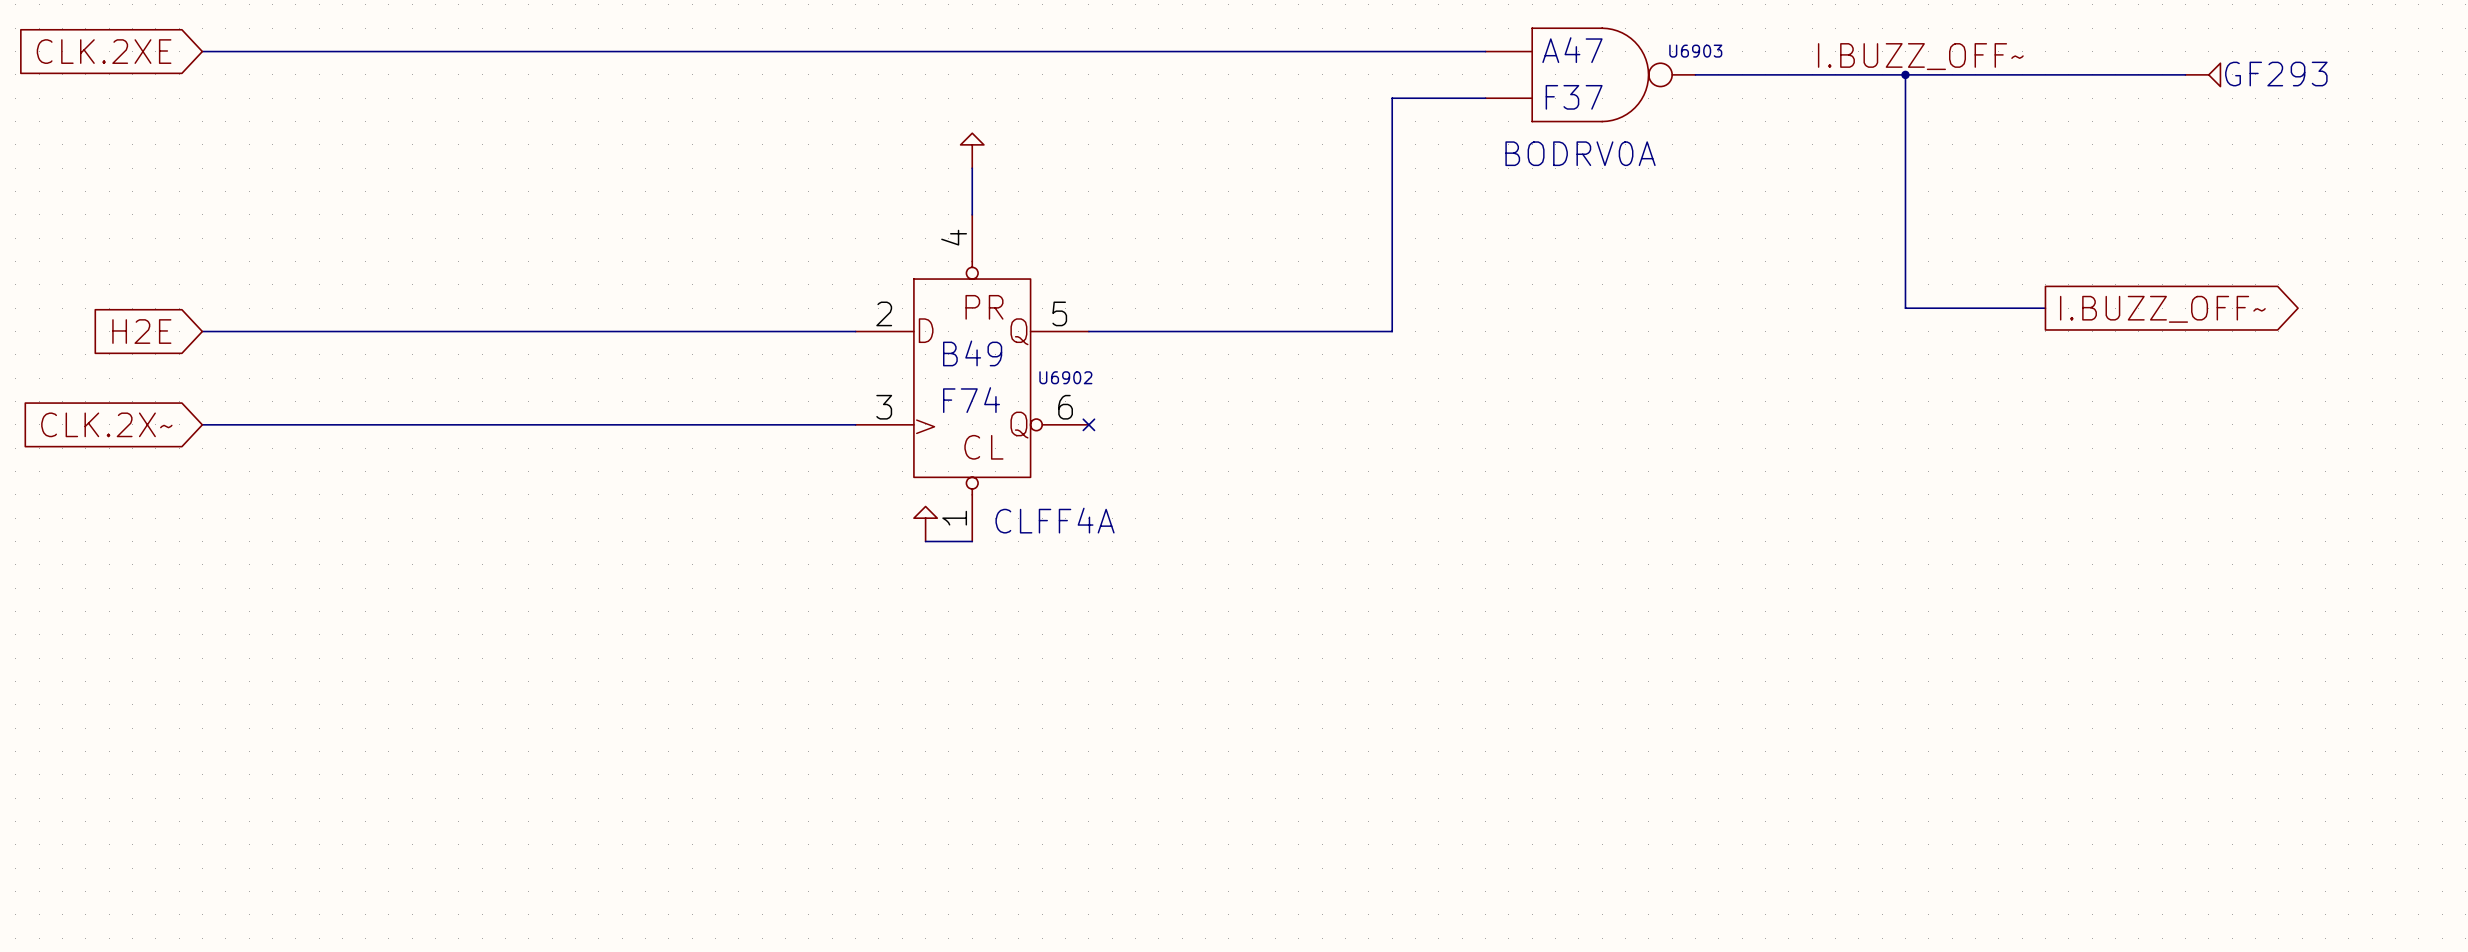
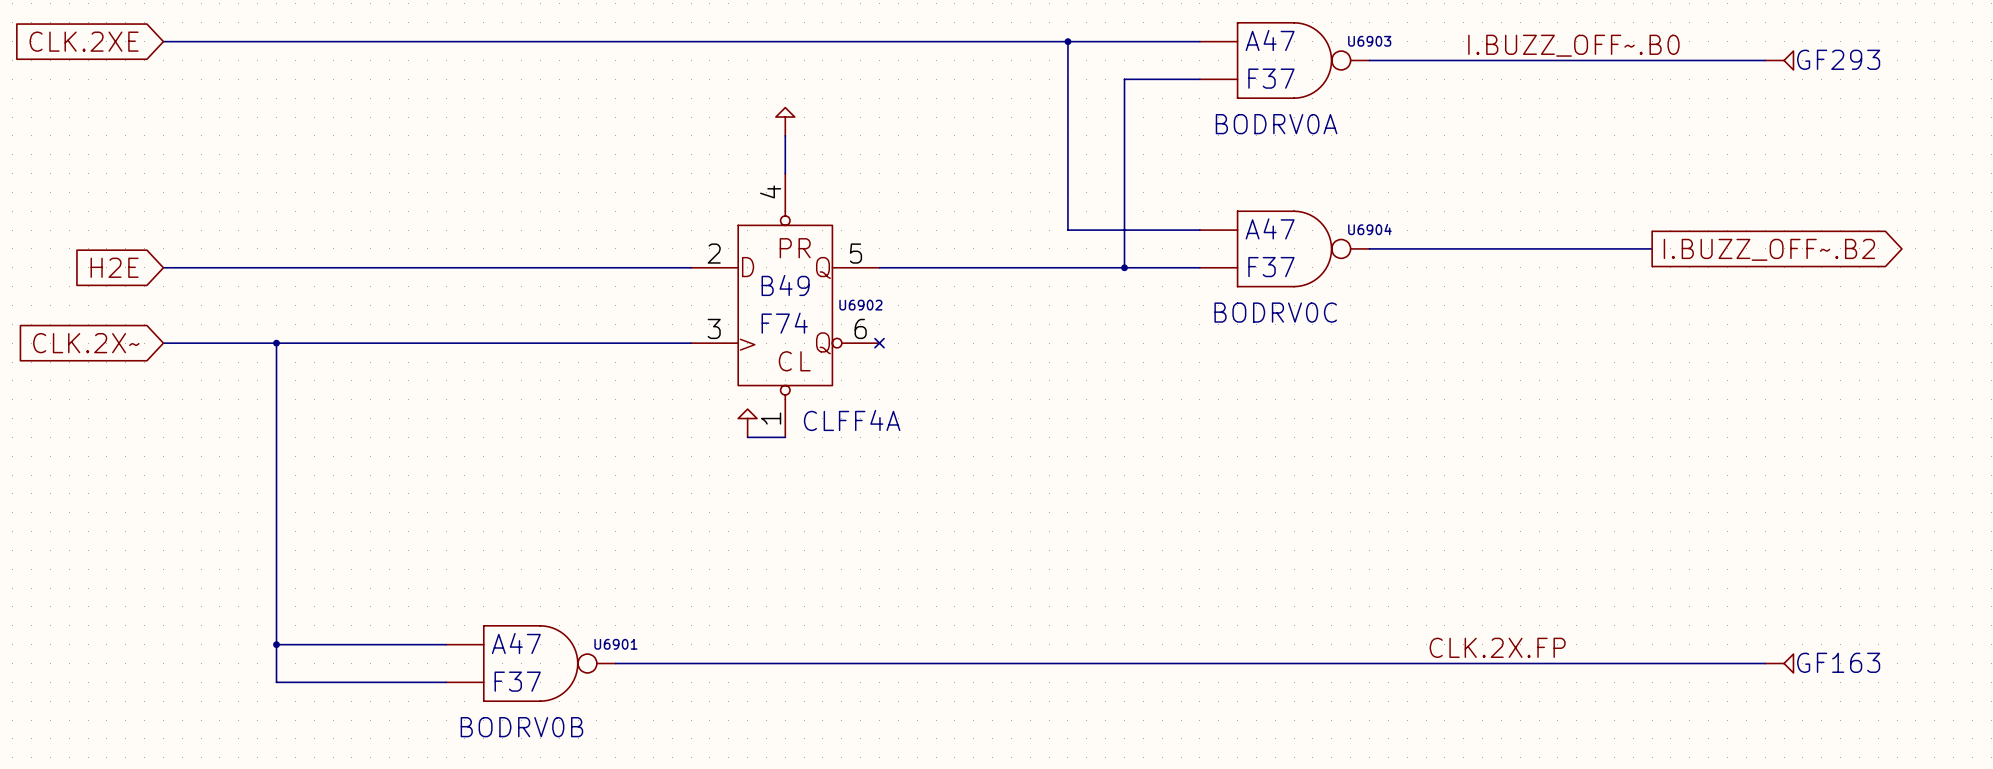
wire: none -> (1067, 41) (1067, 230) (1199, 230)
junction: none -> (1067, 41)
label: I.BUZZ_OFF~ (1920, 56) -> I.BUZZ_OFF~.B0 (1573, 45)
wire: (1905, 74) (1905, 308) -> (1369, 248) (1539, 248)
junction: (1905, 74) -> none
U6904: none -> F37 (1284, 248)
global label: I.BUZZ_OFF~ (2162, 309) -> I.BUZZ_OFF~.B2 (1769, 249)
wire: none -> (1124, 267) (1199, 267)
junction: none -> (1124, 267)
wire: none -> (276, 343) (276, 682) (446, 682)
junction: none -> (276, 343)
wire: none -> (276, 644) (446, 644)
junction: none -> (276, 644)
label: none -> CLK.2X.FP (1497, 647)
U6901: none -> F37 (530, 663)
wire: none -> (615, 663) (1765, 663)
GF163: none -> (1779, 663)

